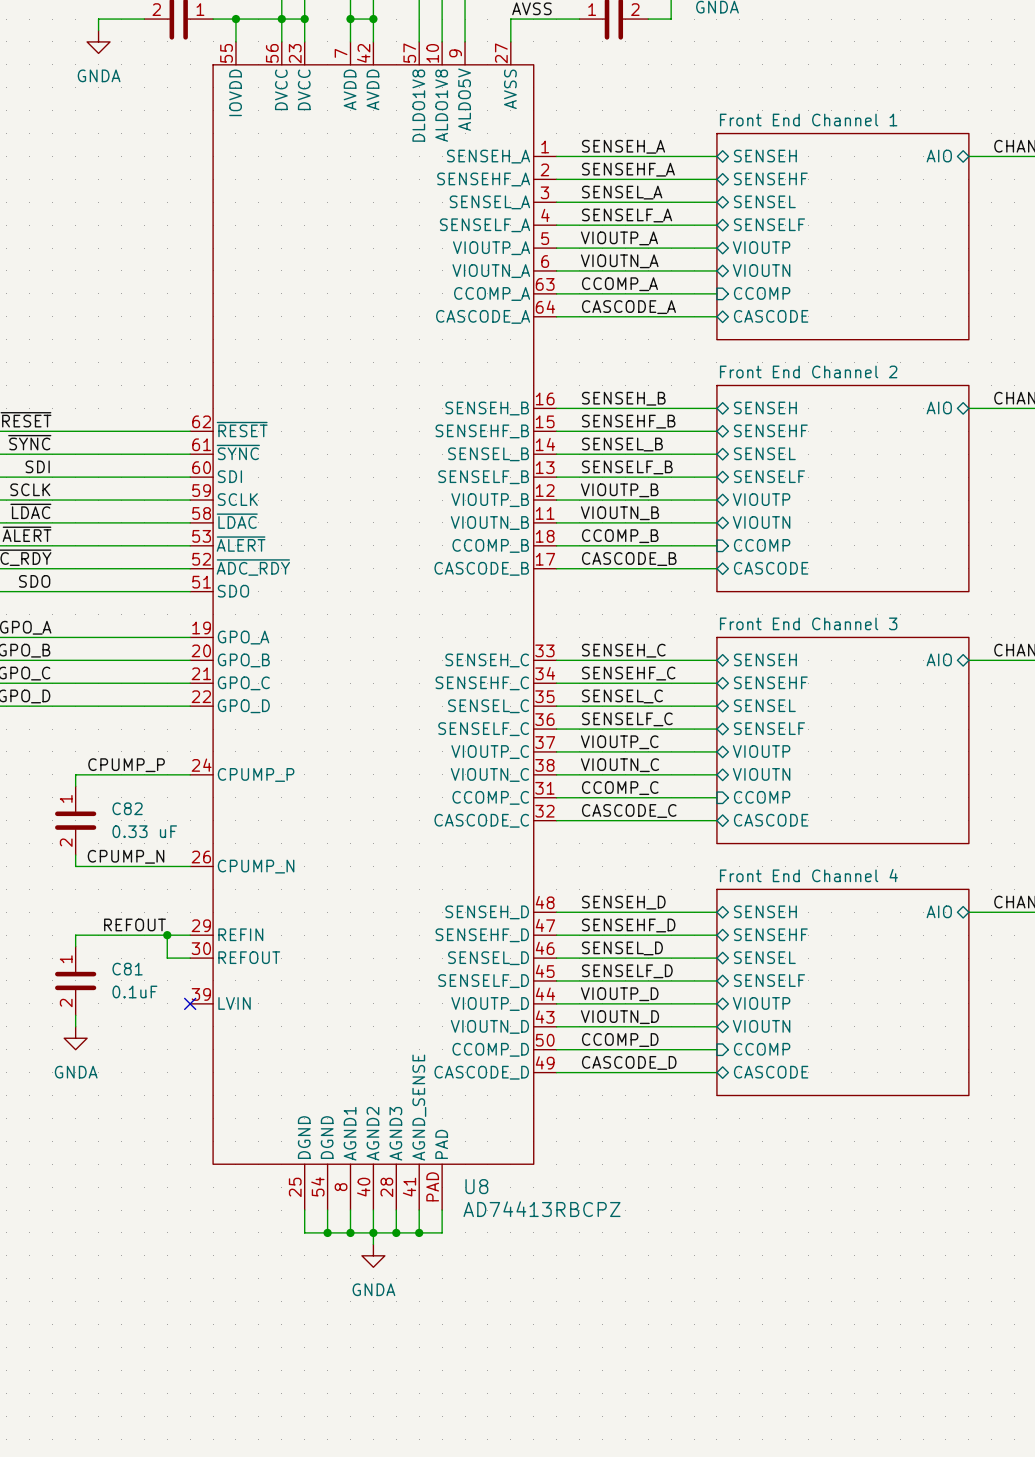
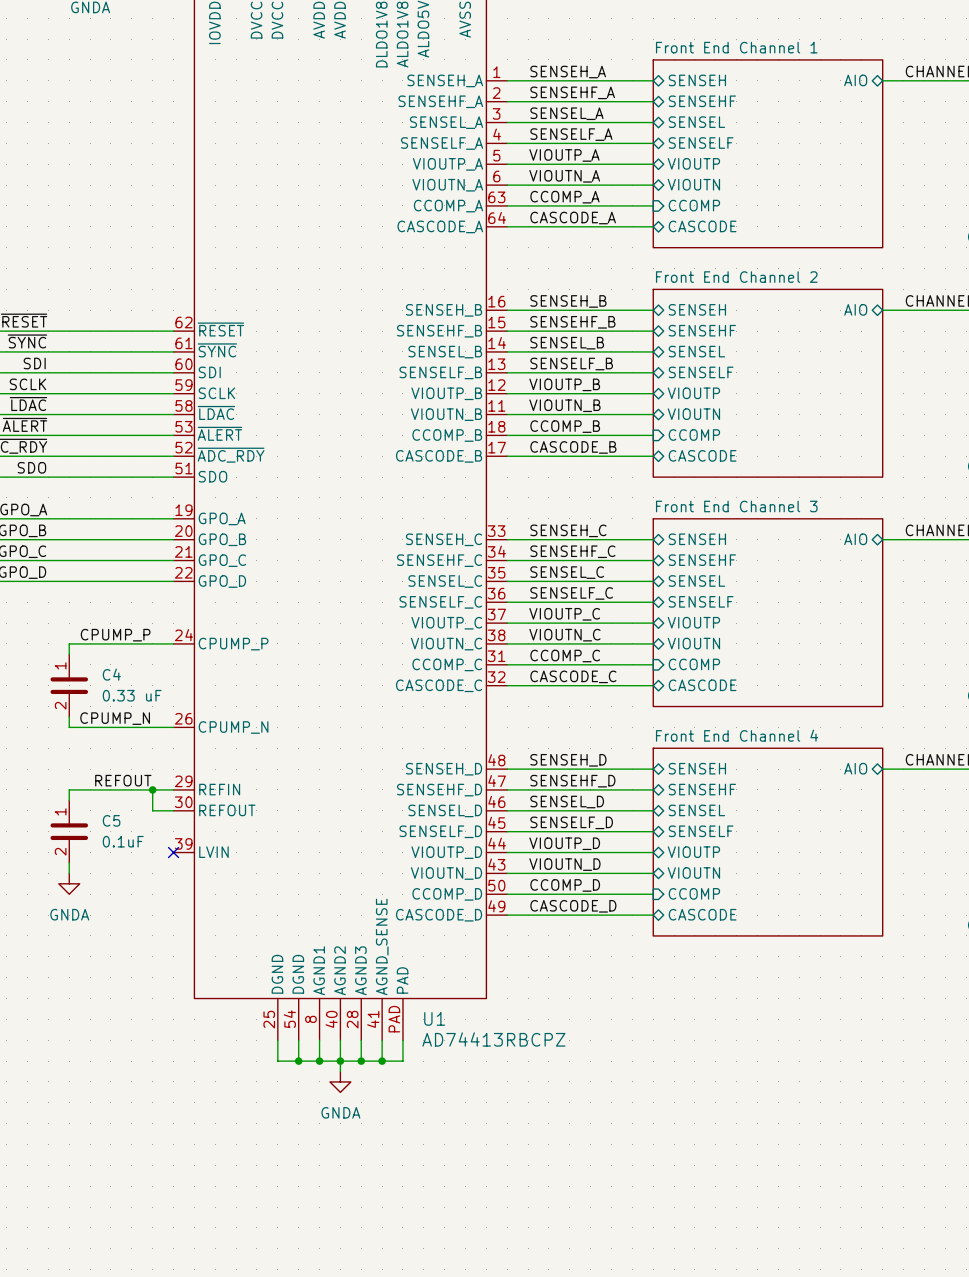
C82 name: C82 (127, 808) -> C4 (111, 674)
C81 name: C81 (127, 969) -> C5 (111, 820)
U8 name: U8 (476, 1186) -> U1 (434, 1018)

